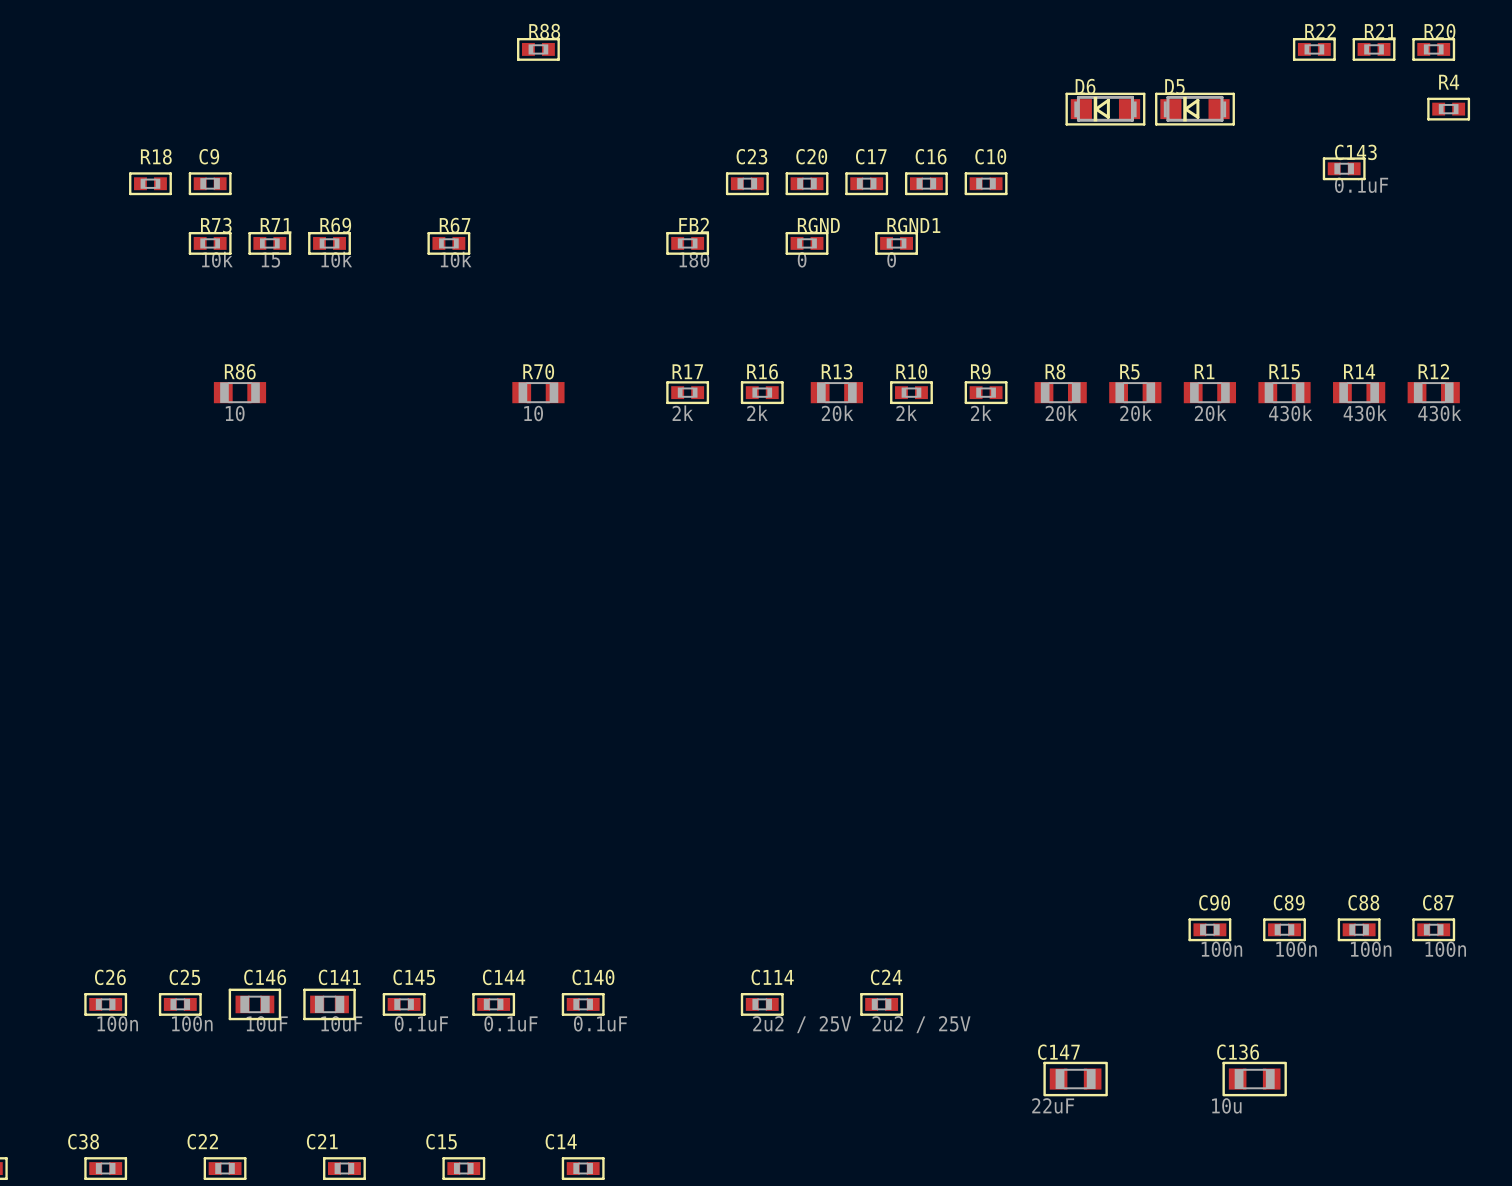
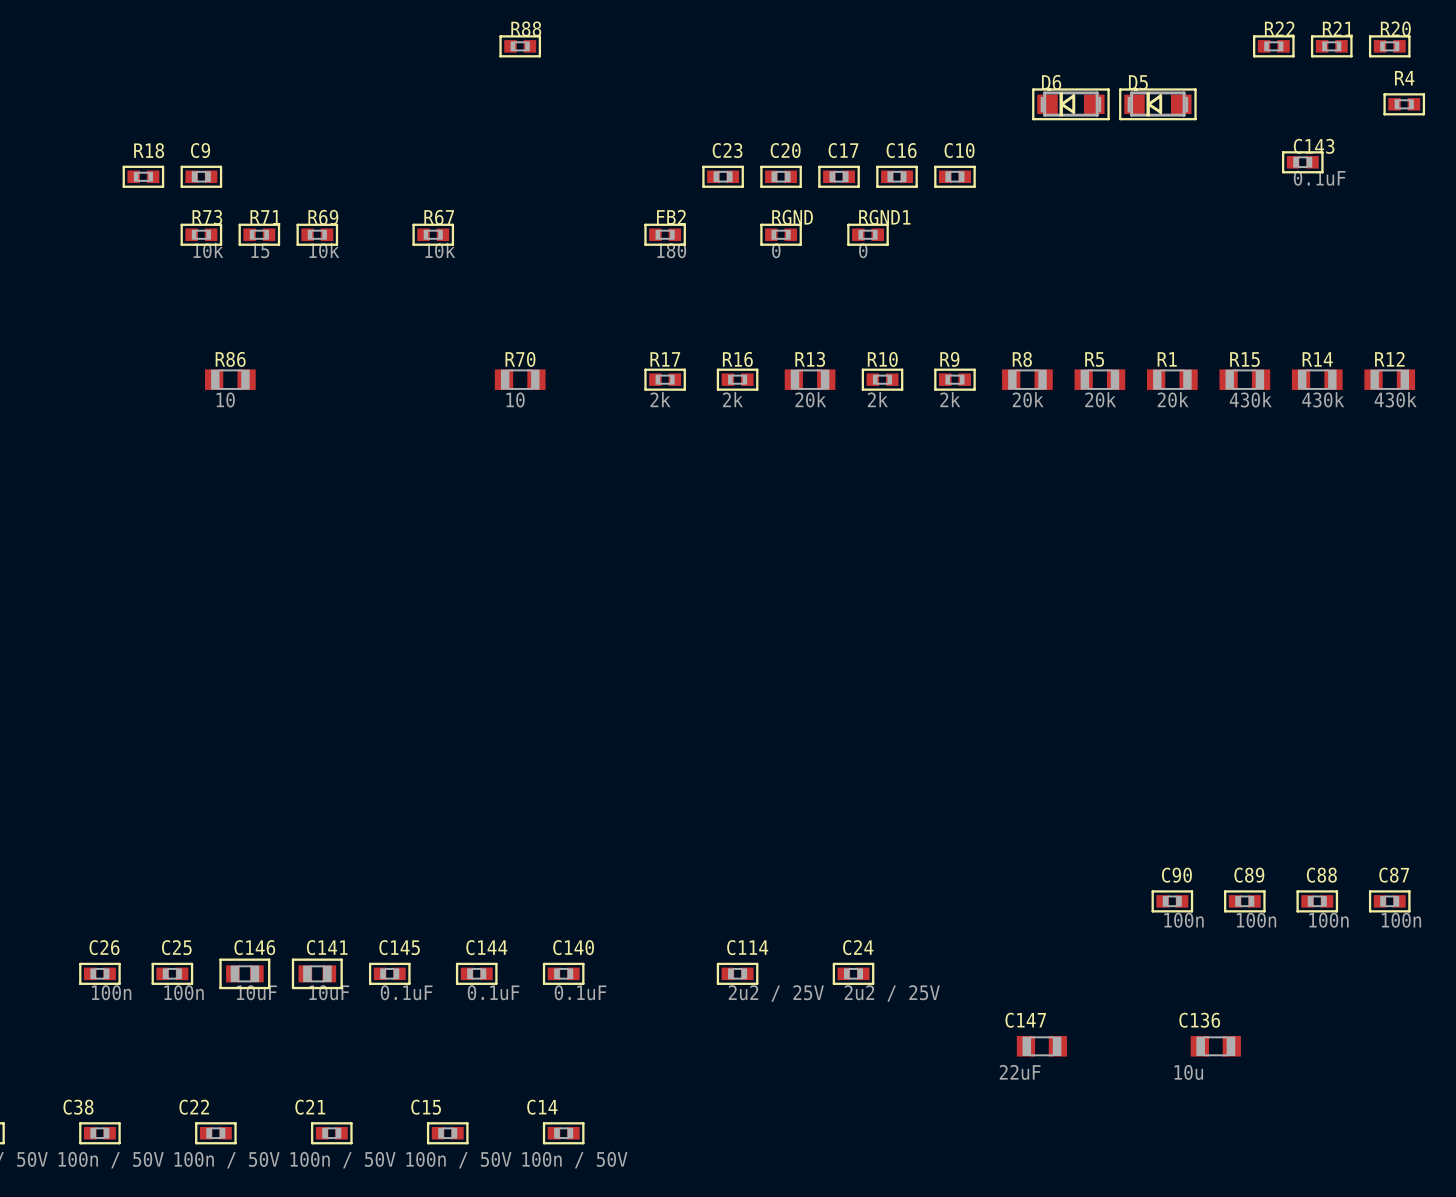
C147 footprint: [1043, 1061, 1108, 1097] -> [1016, 1036, 1068, 1057]
C136 footprint: [1222, 1061, 1287, 1097] -> [1190, 1036, 1241, 1057]

